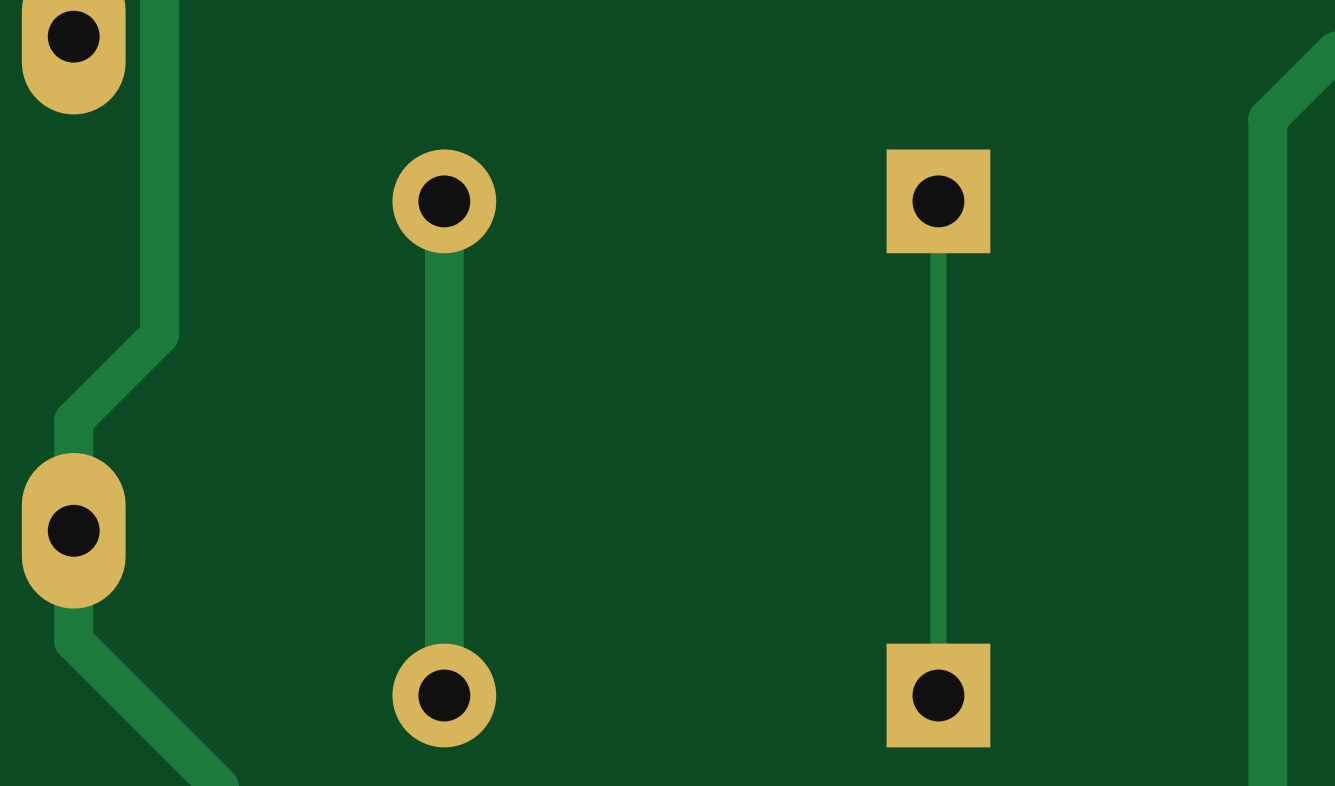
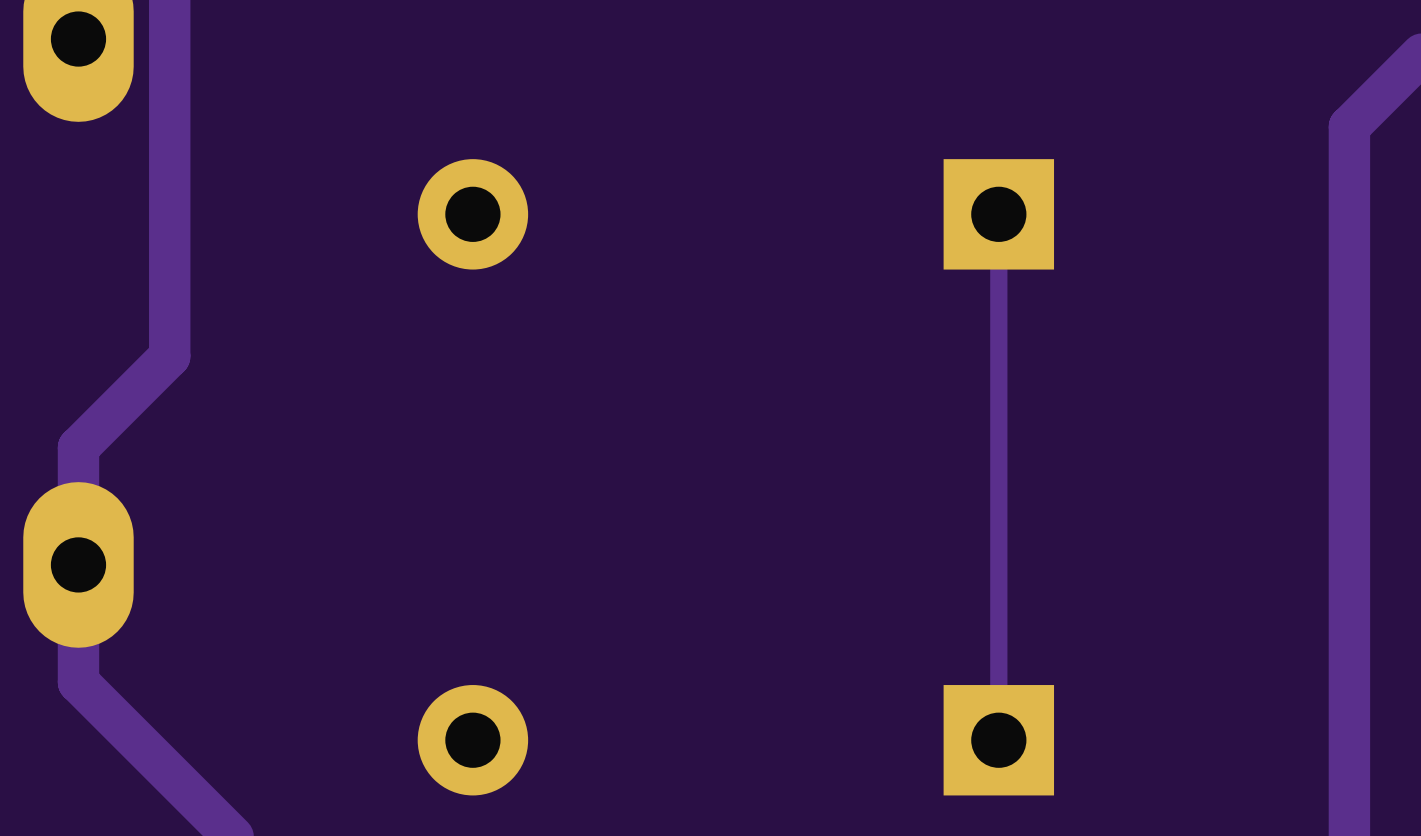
track: (444, 201) (444, 695) -> none

